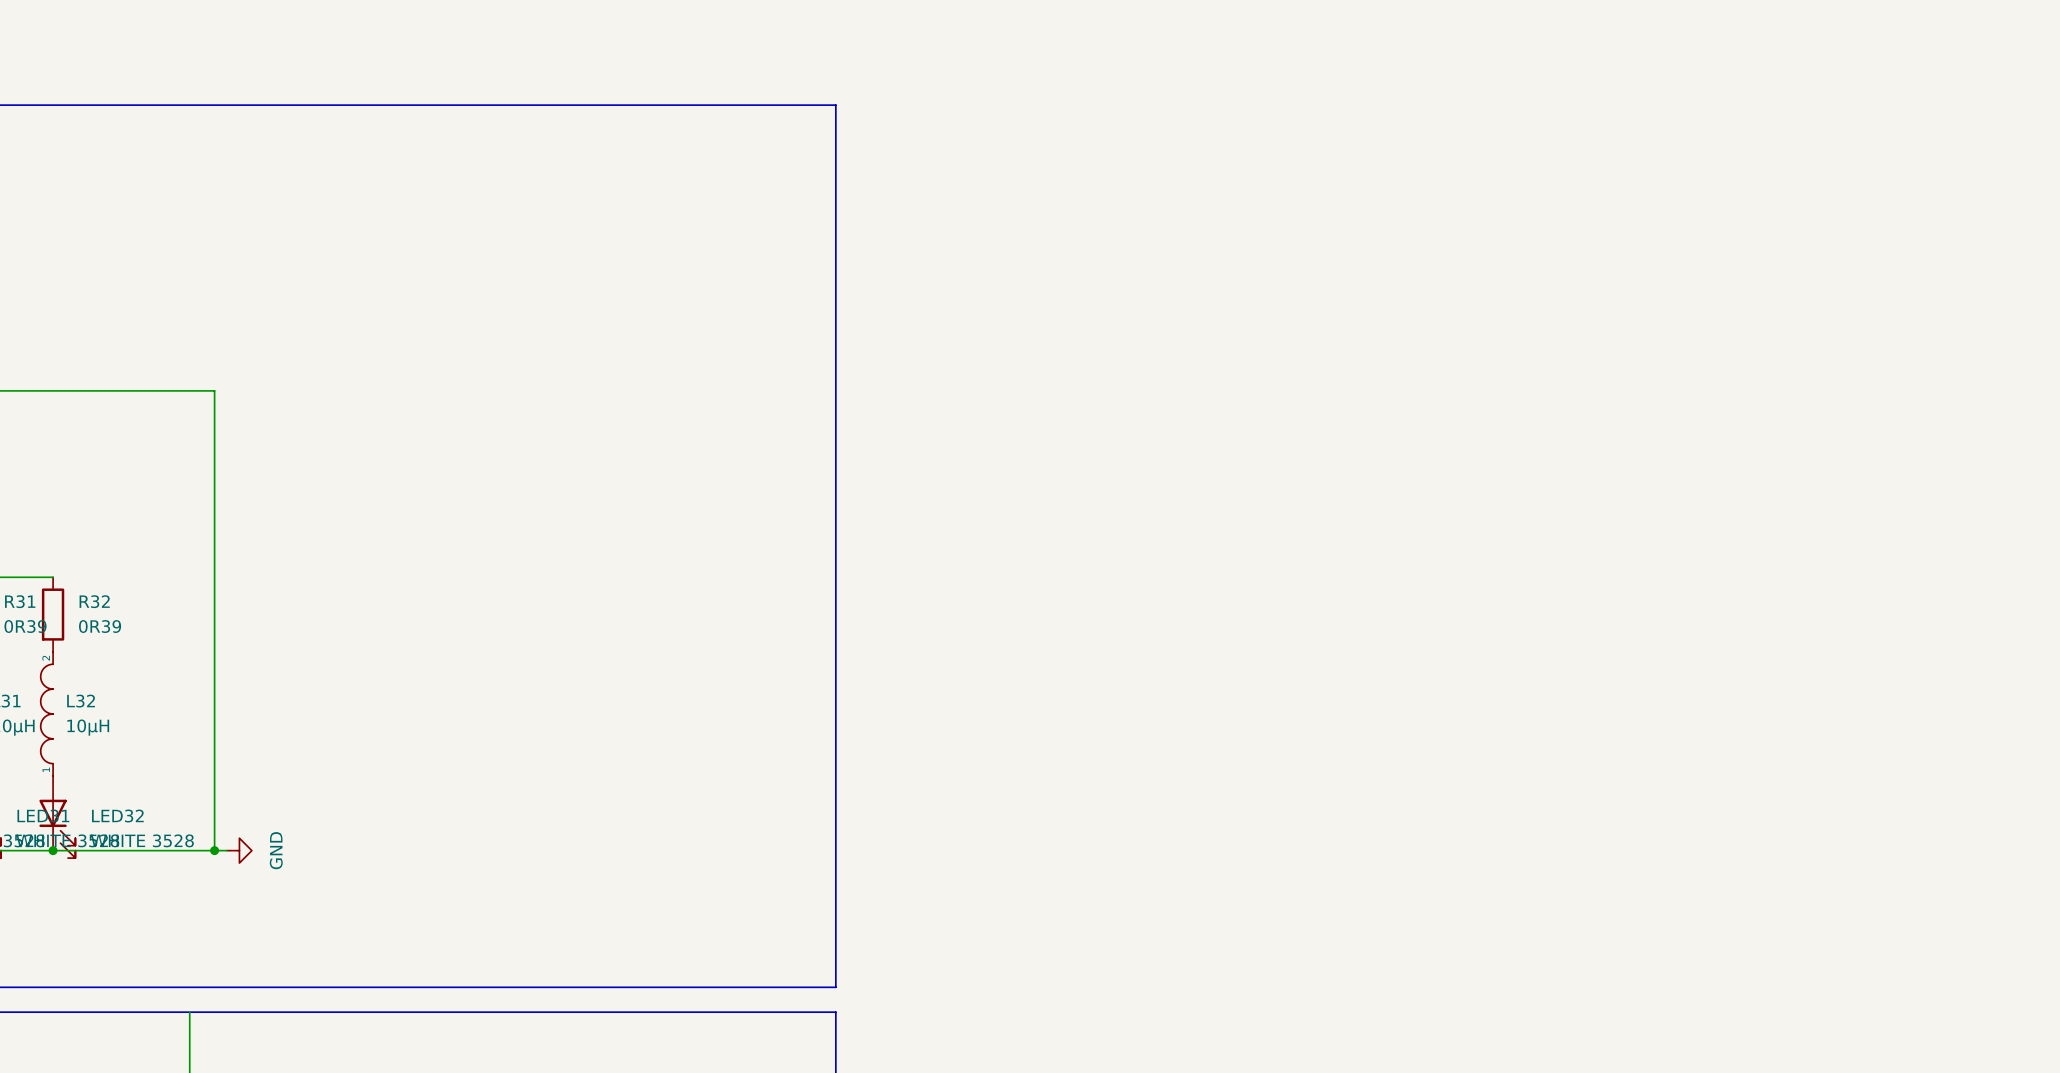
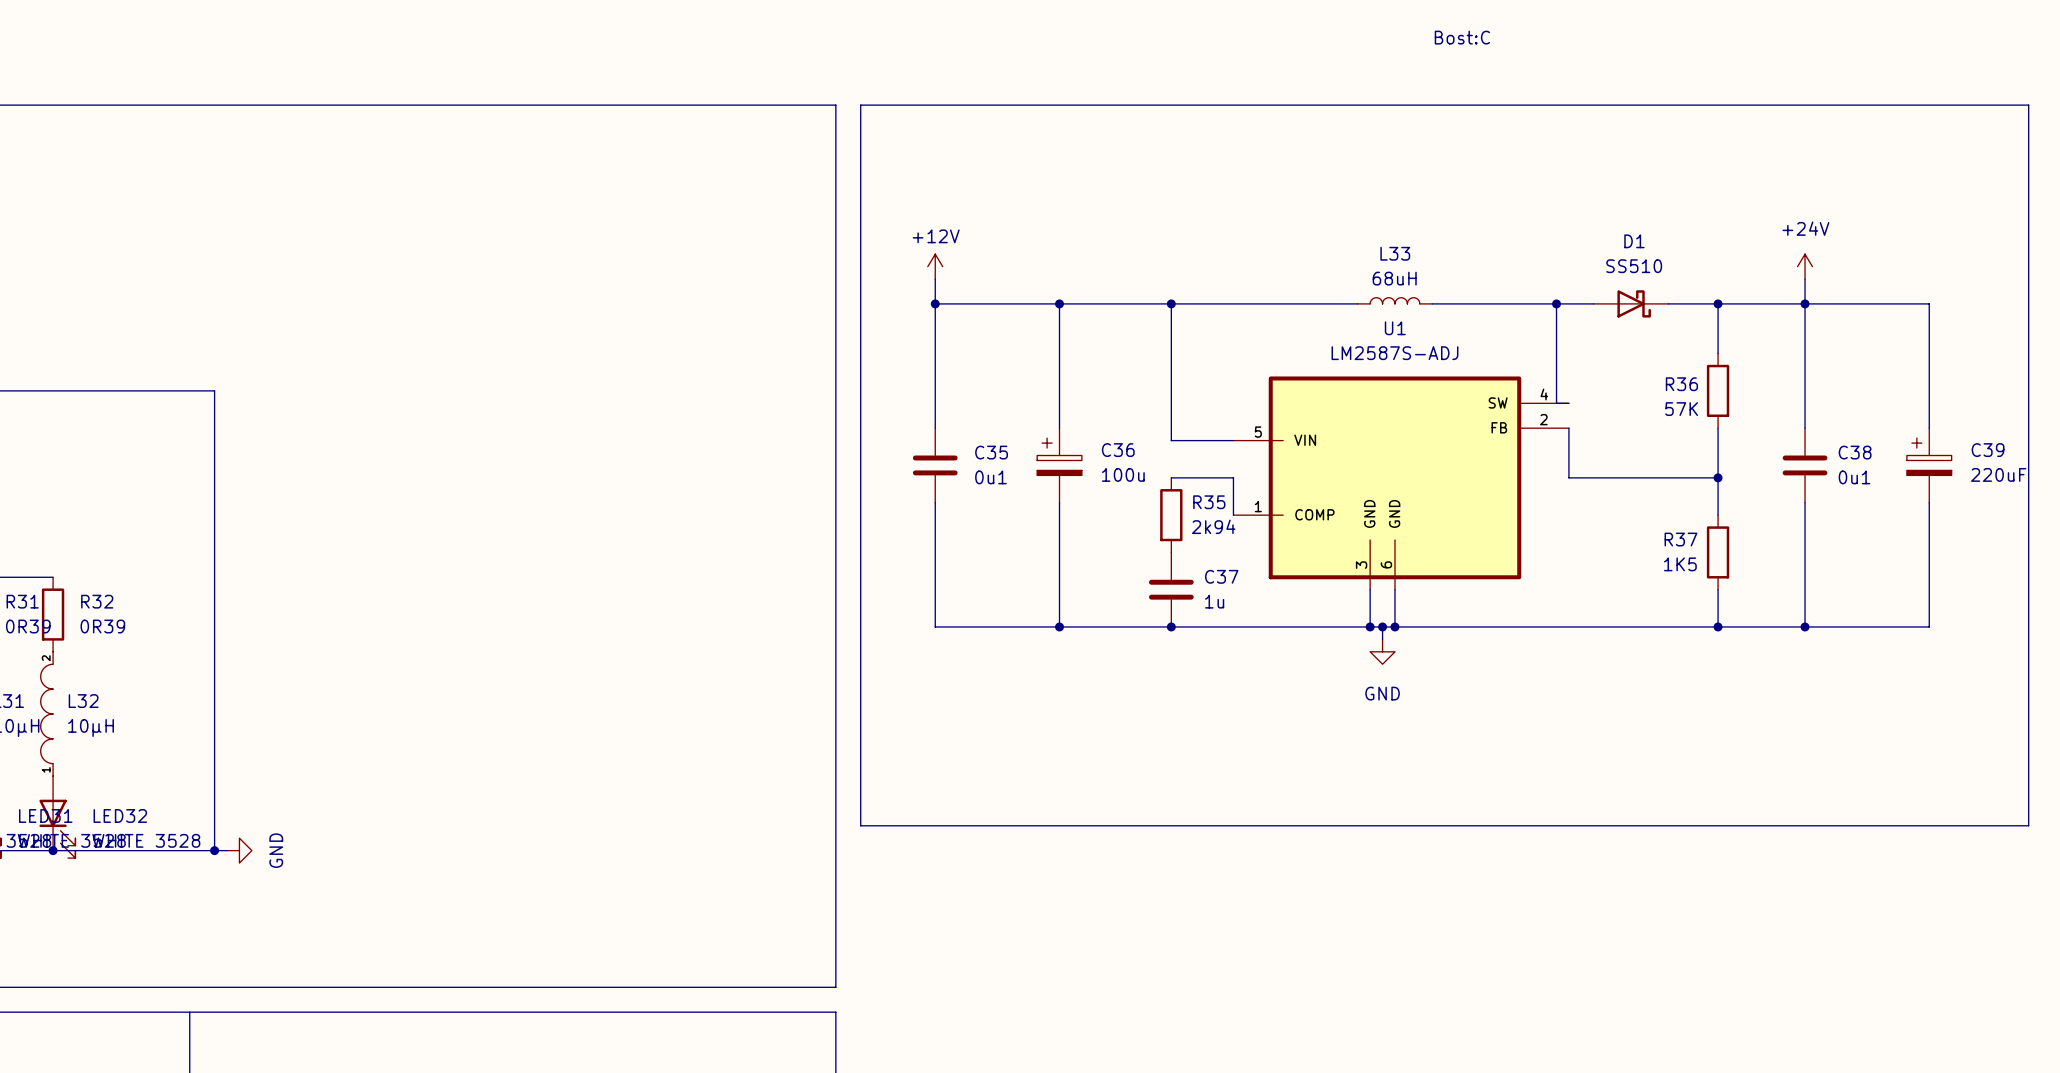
text: none -> Bost:C (1462, 37)
line: none -> (860, 105) (2028, 105) (2028, 825) (860, 825) (860, 105)
power symbol: none -> +12V (935, 266)
power symbol: none -> +24V (1805, 266)
wire: none -> (935, 279) (935, 428)
wire: none -> (1805, 279) (1805, 428)
L33: none -> 68uH (1394, 300)
wire: none -> (935, 303) (1357, 303)
junction: none -> (935, 303)
wire: none -> (1059, 303) (1059, 428)
junction: none -> (1059, 303)
wire: none -> (1171, 303) (1171, 440) (1233, 440)
junction: none -> (1171, 303)
wire: none -> (1432, 303) (1593, 303)
wire: none -> (1556, 303) (1556, 403) (1568, 403)
junction: none -> (1556, 303)
D1: none -> SS510 (1631, 303)
wire: none -> (1668, 303) (1929, 303) (1929, 428)
wire: none -> (1718, 303) (1718, 353)
junction: none -> (1718, 303)
junction: none -> (1805, 303)
R36: none -> 57K (1718, 390)
wire: none -> (1568, 428) (1568, 477) (1718, 477)
wire: none -> (1718, 428) (1718, 515)
C35: none -> 0u1 (935, 465)
C36: none -> 100u (1059, 465)
C38: none -> 0u1 (1805, 465)
C39: none -> 220uF (1929, 465)
wire: none -> (1171, 477) (1233, 477) (1233, 515)
junction: none -> (1718, 477)
U1: none -> LM2587S-ADJ (1401, 483)
wire: none -> (935, 502) (935, 626) (1929, 626) (1929, 502)
wire: none -> (1059, 502) (1059, 626)
wire: none -> (1805, 502) (1805, 626)
R35: none -> 2k94 (1171, 515)
R37: none -> 1K5 (1718, 552)
C37: none -> 1u (1171, 589)
wire: none -> (1370, 589) (1370, 626)
wire: none -> (1394, 589) (1394, 626)
wire: none -> (1718, 589) (1718, 626)
junction: none -> (1059, 626)
junction: none -> (1171, 626)
junction: none -> (1370, 626)
wire: none -> (1382, 626) (1382, 639)
junction: none -> (1382, 626)
junction: none -> (1394, 626)
junction: none -> (1718, 626)
junction: none -> (1805, 626)
power symbol: none -> GND (1382, 651)

